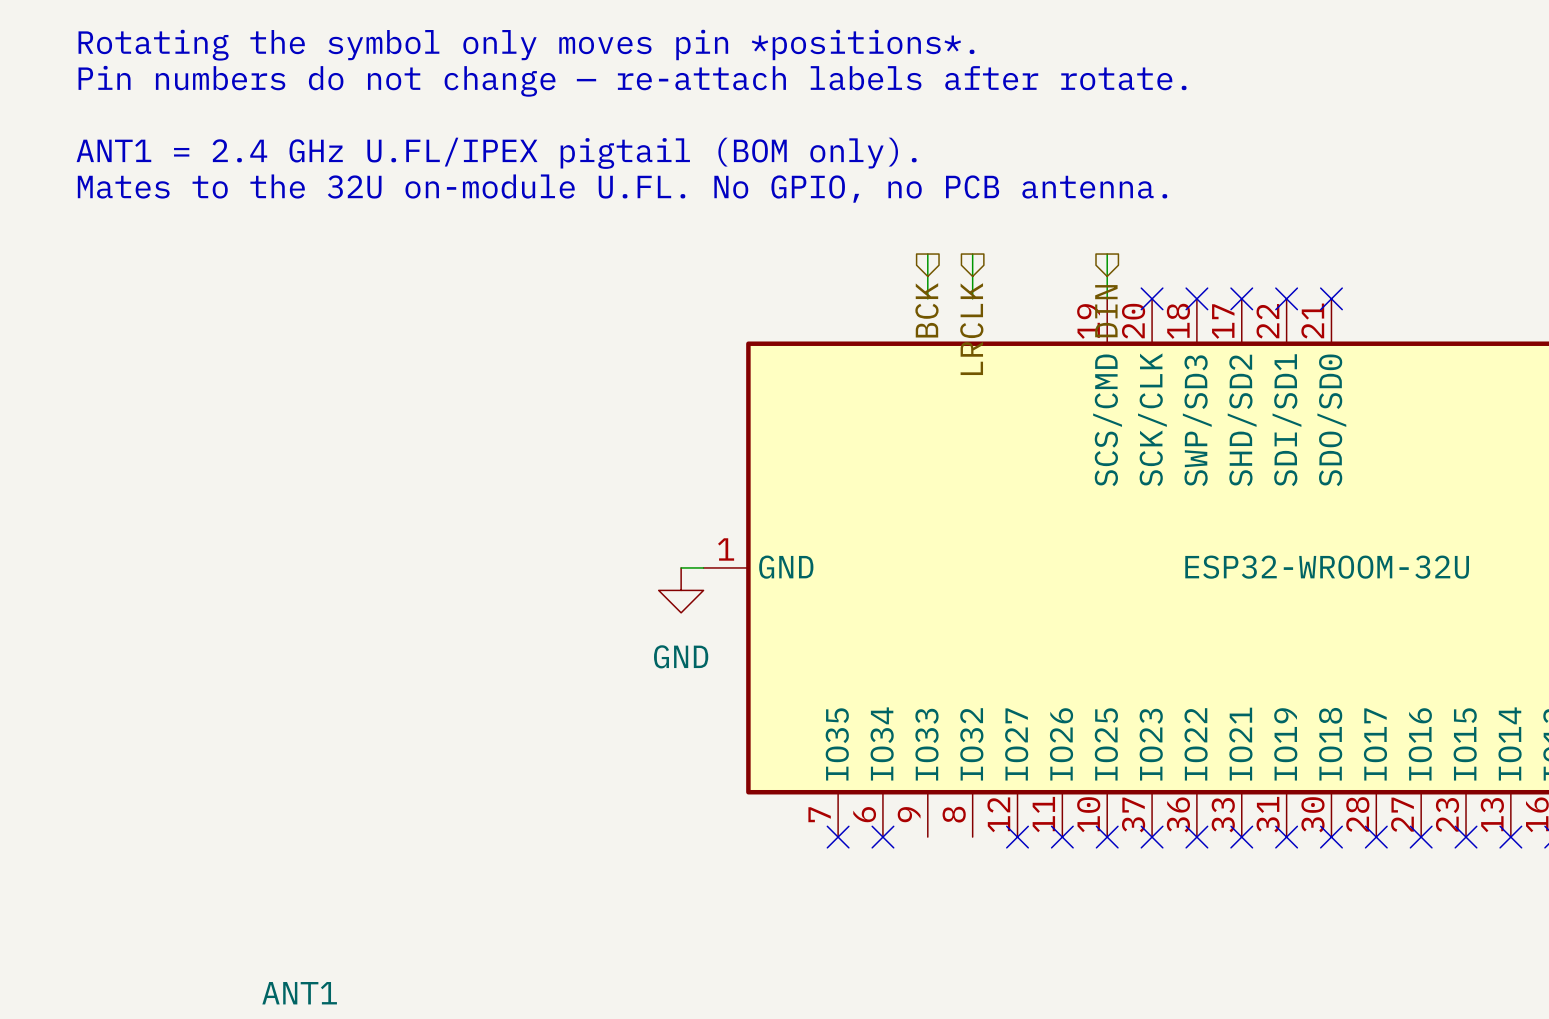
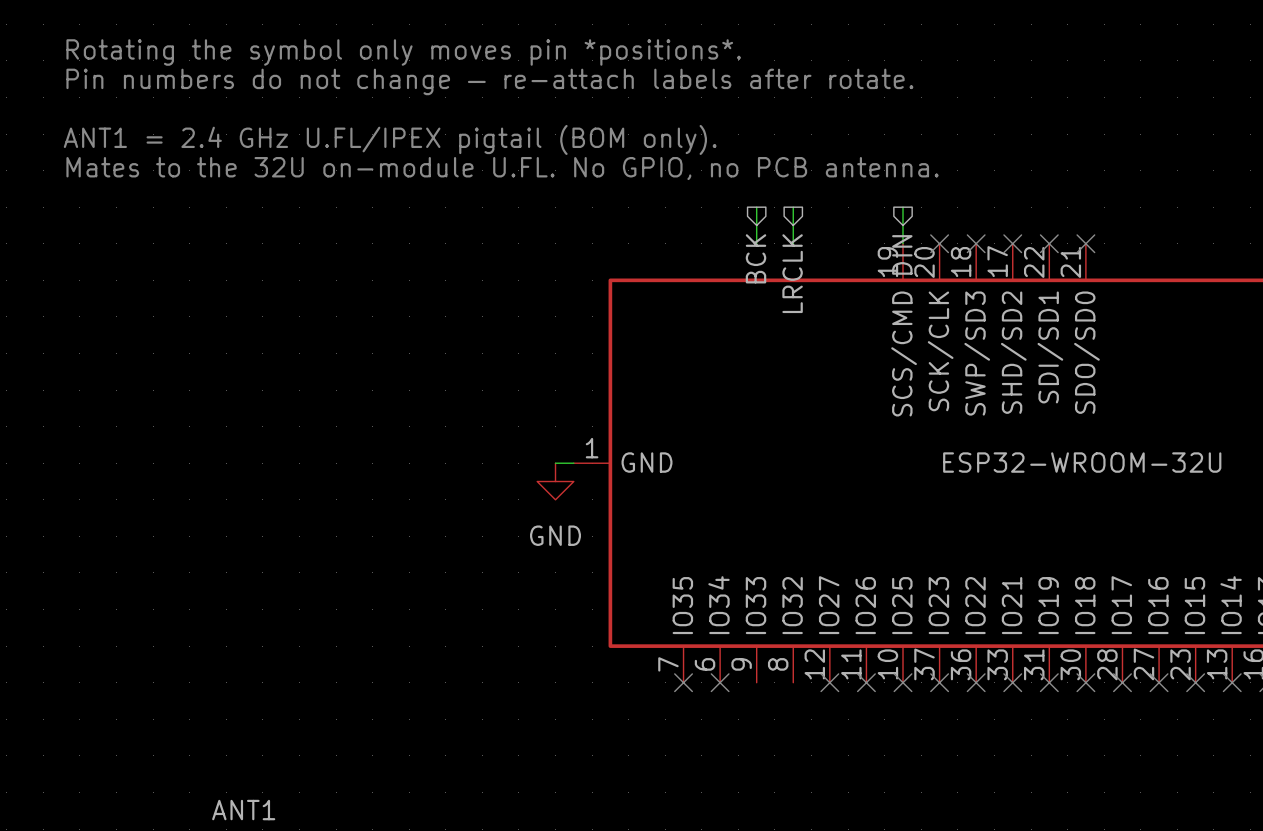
text position: Rotating the symbol only moves pin *positions*. (526, 45) -> Rotating the symbol only moves pin *positions*. (403, 52)
text position: Pin numbers do not change — re-attach labels after rotate. (632, 81) -> Pin numbers do not change — re-attach labels after rotate. (489, 81)
text position: ANT1 = 2.4 GHz U.FL/IPEX pigtail (BOM only). (496, 153) -> ANT1 = 2.4 GHz U.FL/IPEX pigtail (BOM only). (390, 139)
text position: Mates to the 32U on-module U.FL. No GPIO, no PCB antenna. (622, 188) -> Mates to the 32U on-module U.FL. No GPIO, no PCB antenna. (502, 168)

